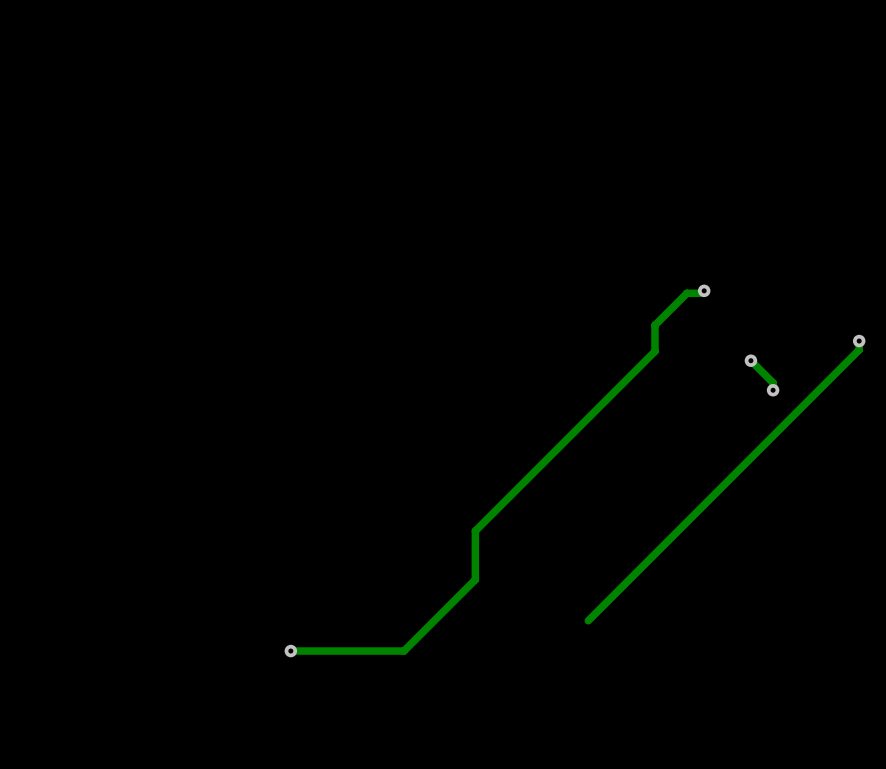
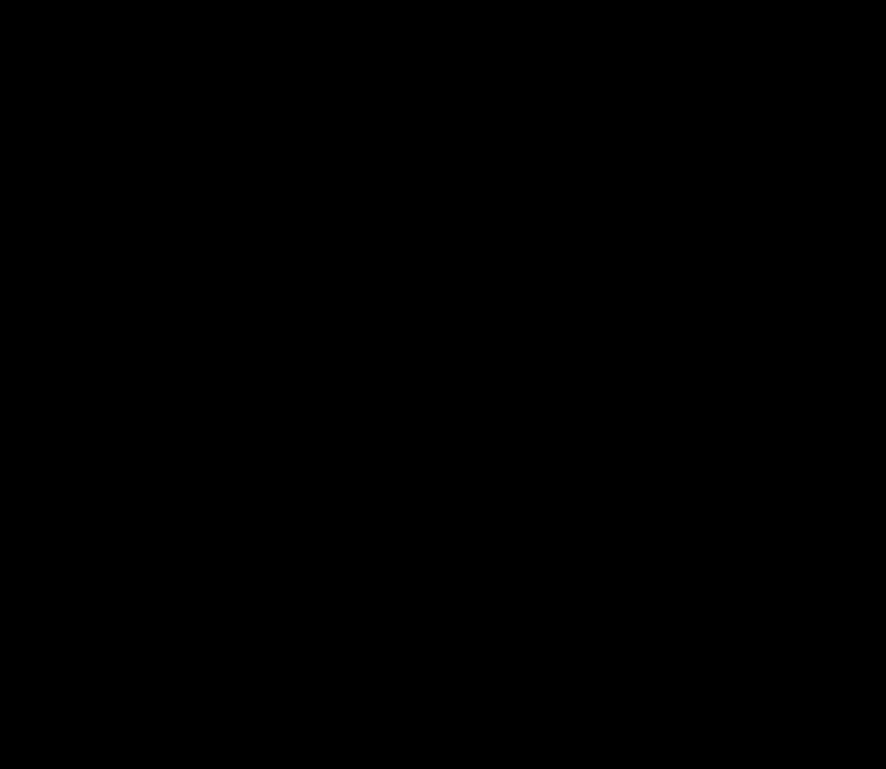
track: (704, 290) (701, 293) (686, 293) (654, 325) (654, 351) (475, 530) (475, 579) (404, 651) (290, 651) -> none
via: (704, 290) -> none
track: (859, 341) (859, 349) (588, 620) -> none
via: (859, 341) -> none
track: (750, 360) (773, 382) (773, 390) -> none
via: (750, 360) -> none
via: (773, 390) -> none
via: (290, 651) -> none

